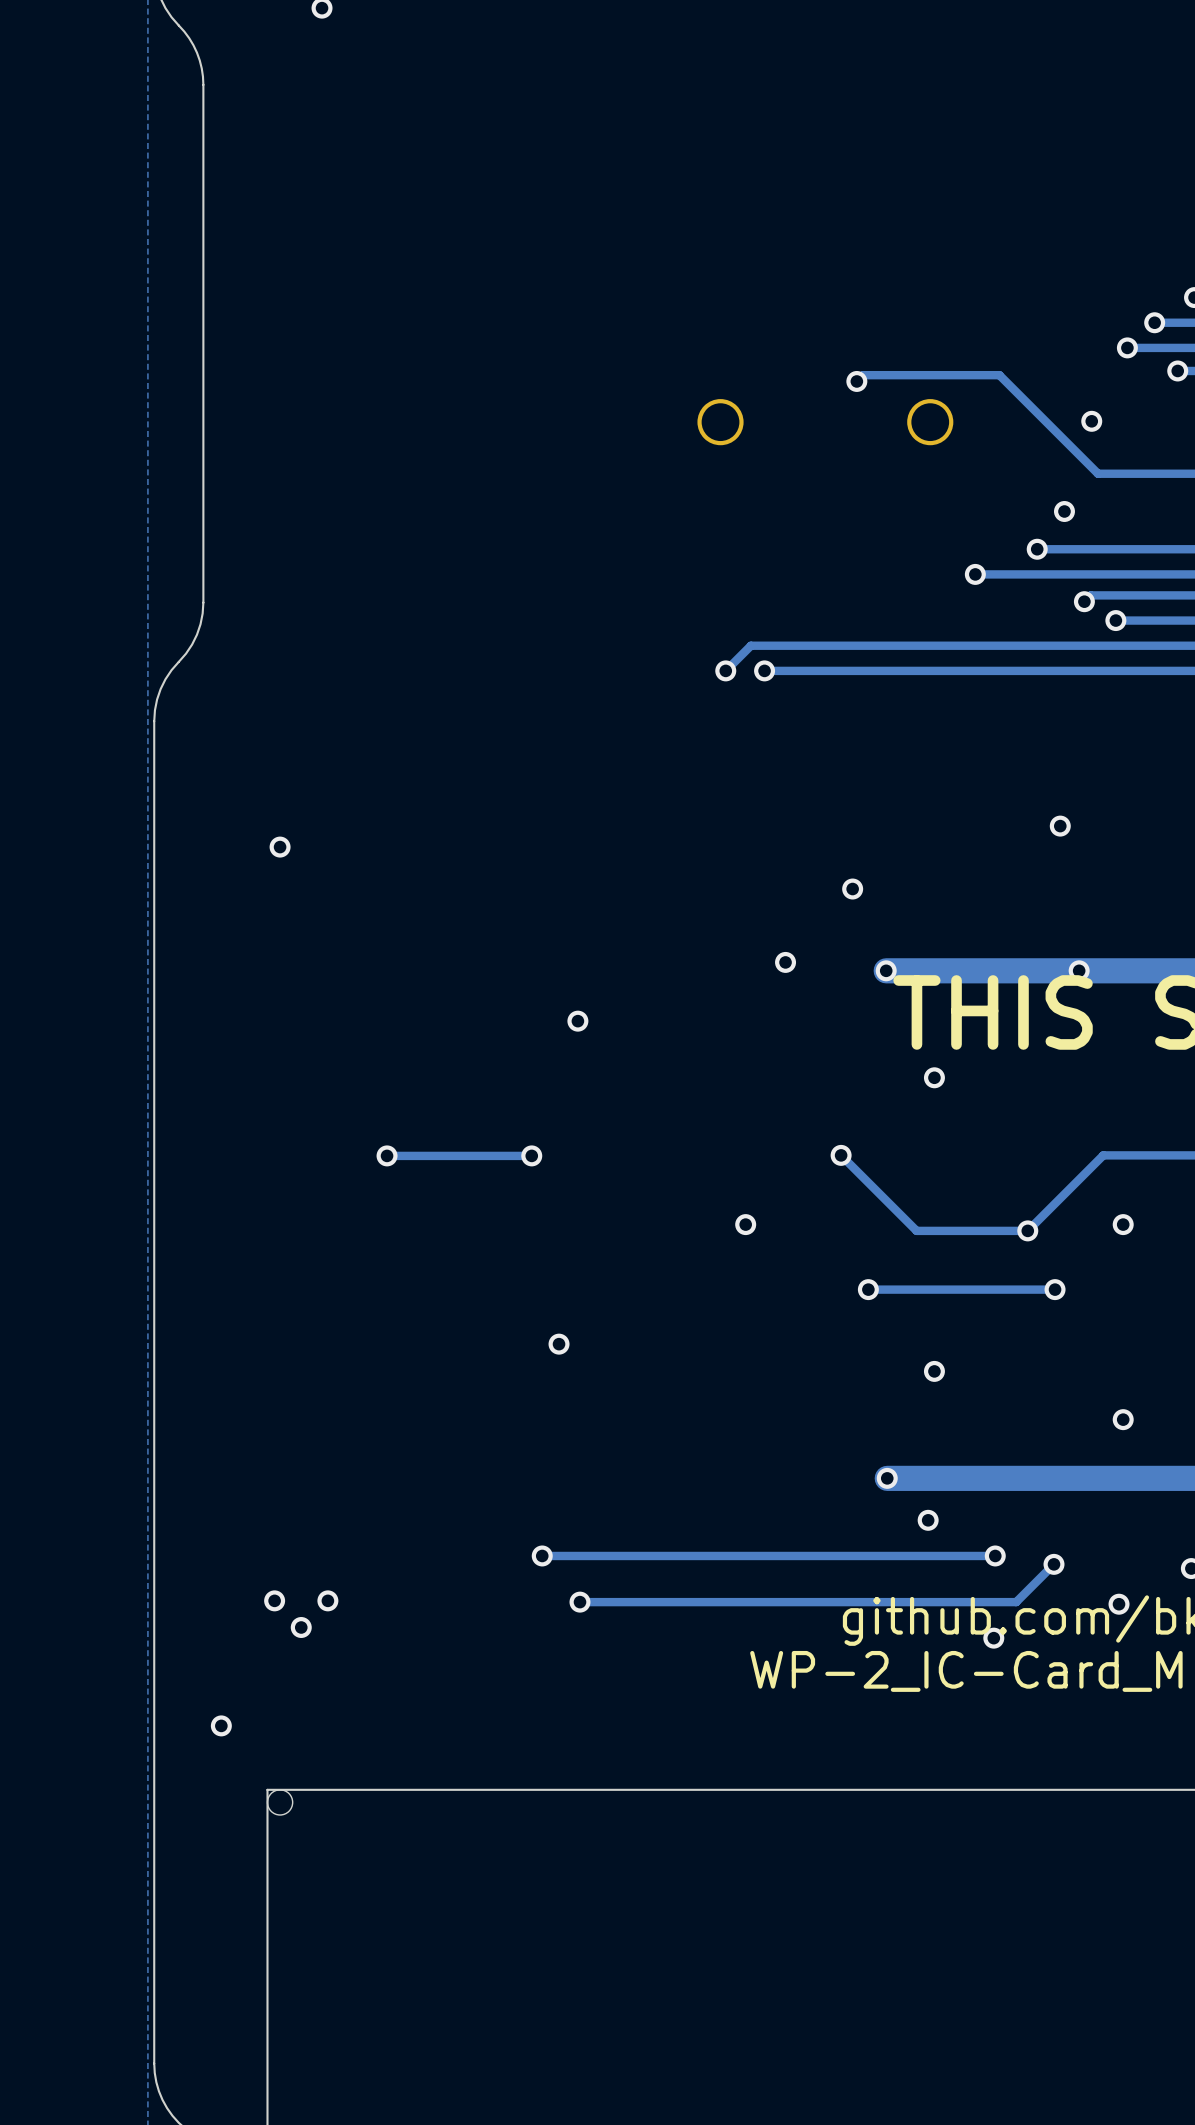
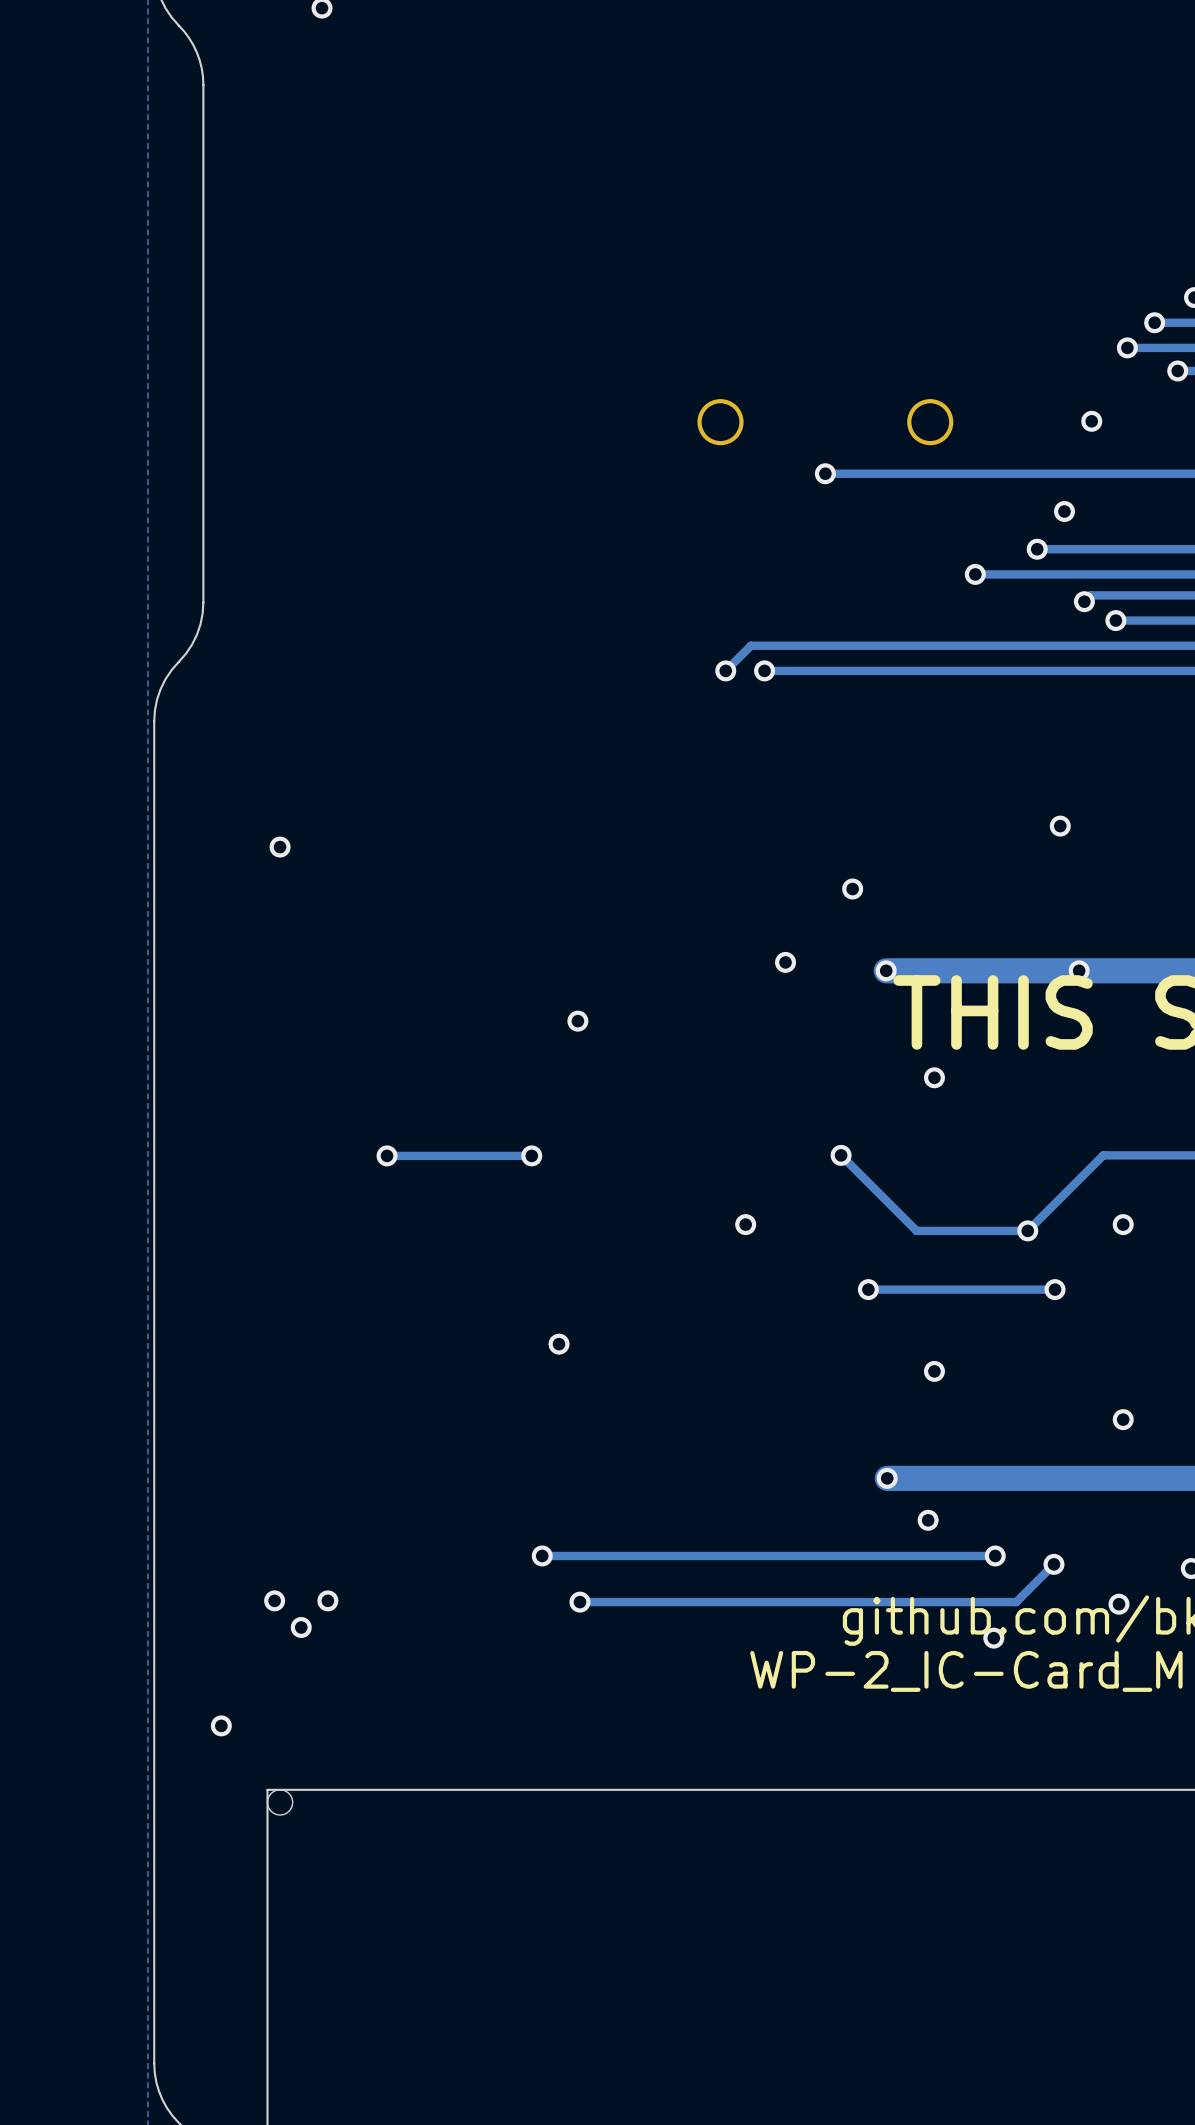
track: (856, 381) (863, 375) (999, 375) (1098, 473) -> (825, 473) (1098, 473)
via position: (856, 381) -> (825, 473)

